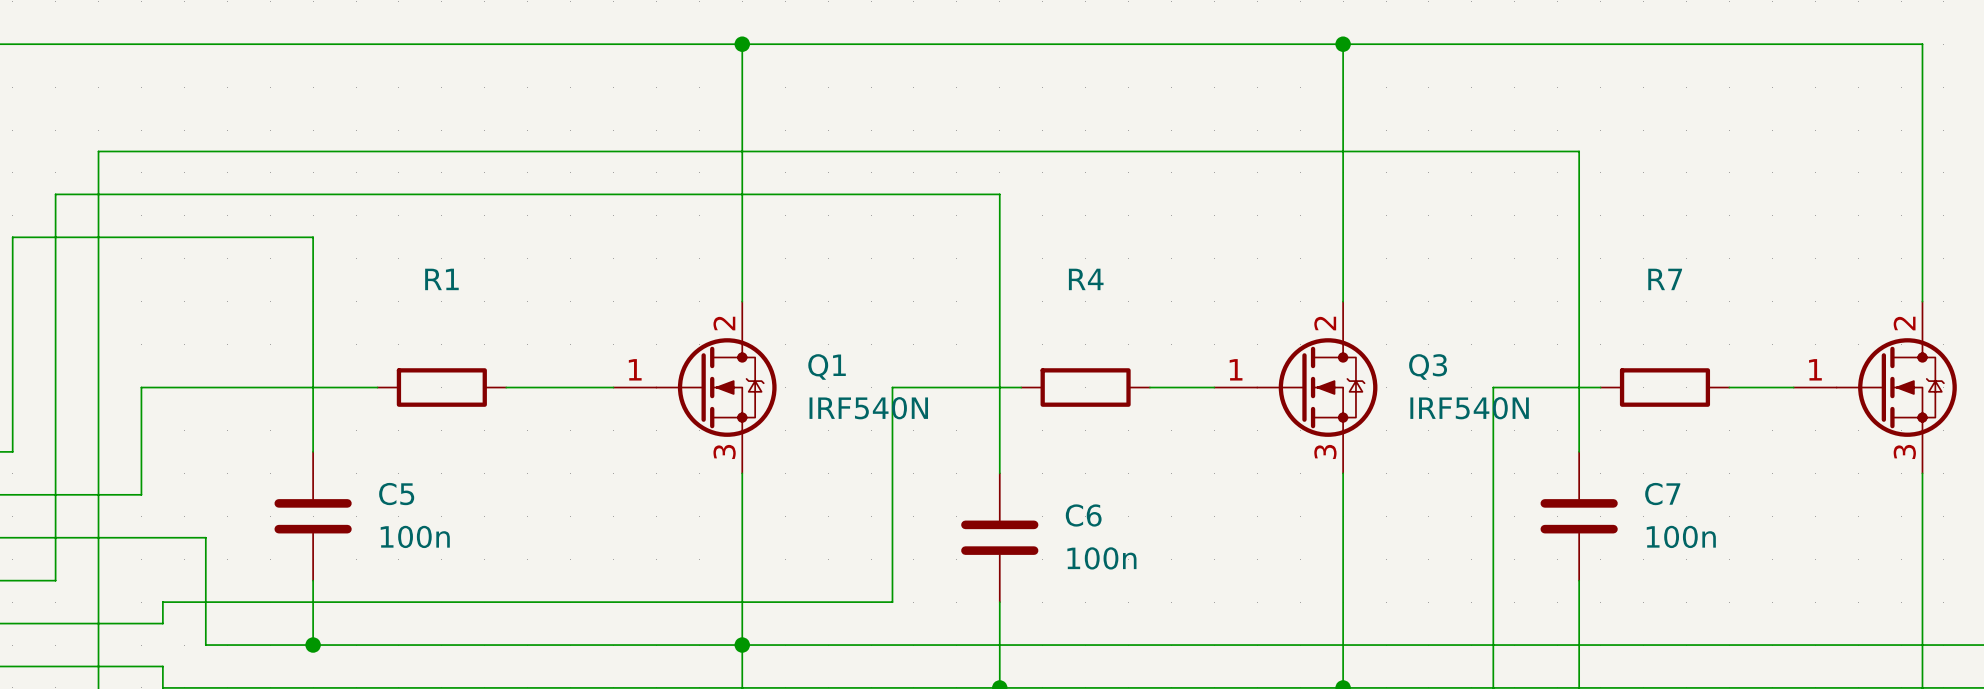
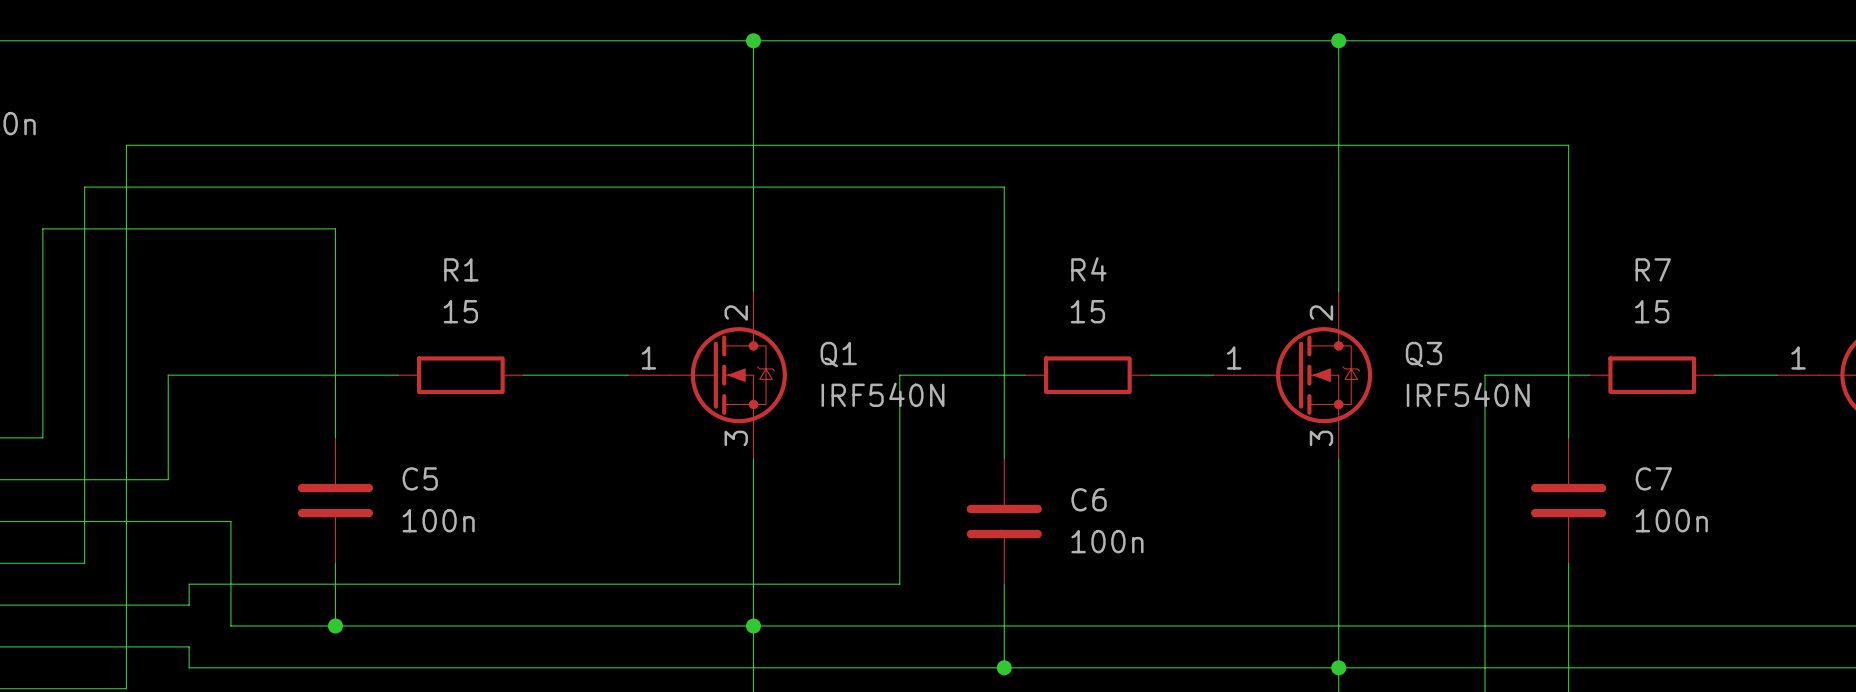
R1 value: none -> 15 (460, 311)
R4 value: none -> 15 (1087, 311)
R7 value: none -> 15 (1652, 311)

